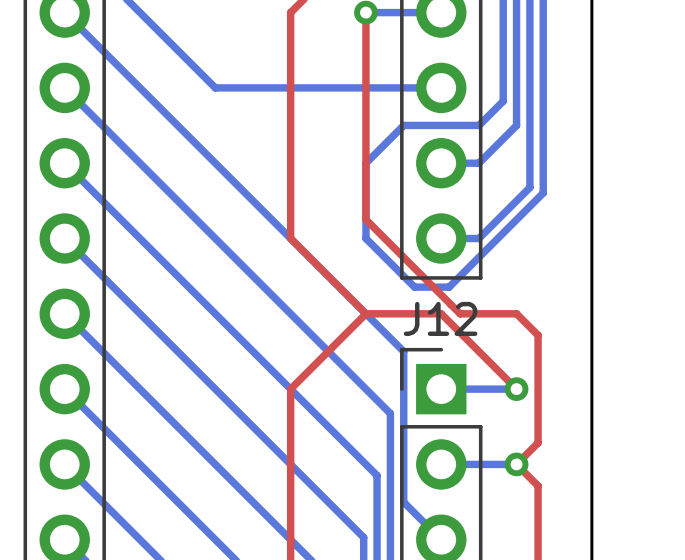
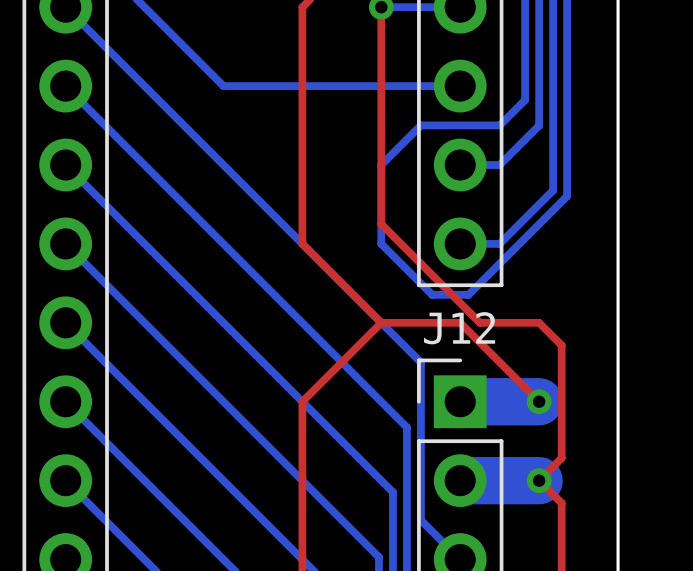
bottom track width: thin (441, 389) (516, 389) -> thick (460, 401) (539, 401)
bottom track width: thin (441, 464) (516, 464) -> thick (460, 480) (539, 480)

